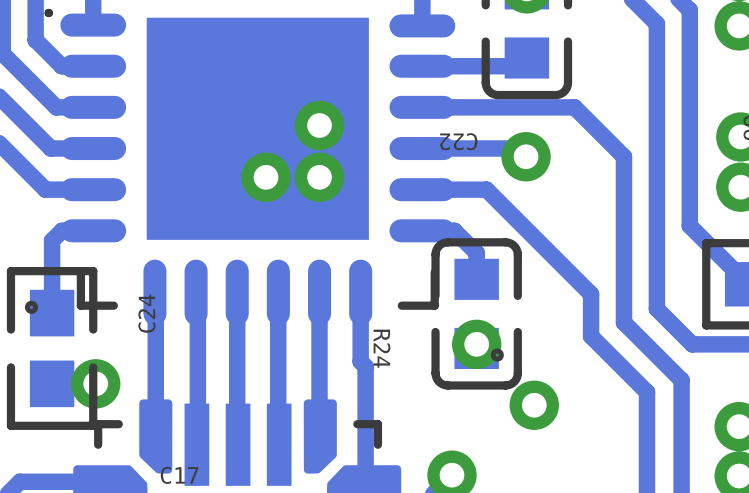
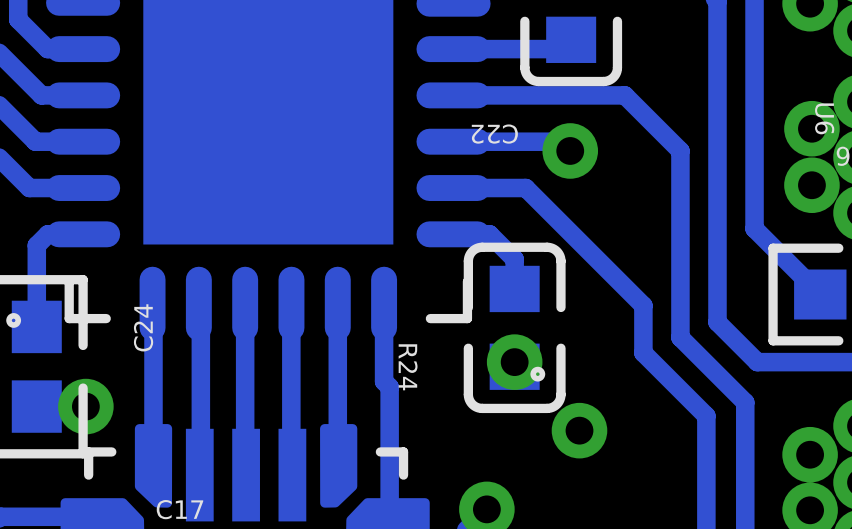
via: (319, 125) -> none
via: (266, 177) -> none
via: (319, 177) -> none

